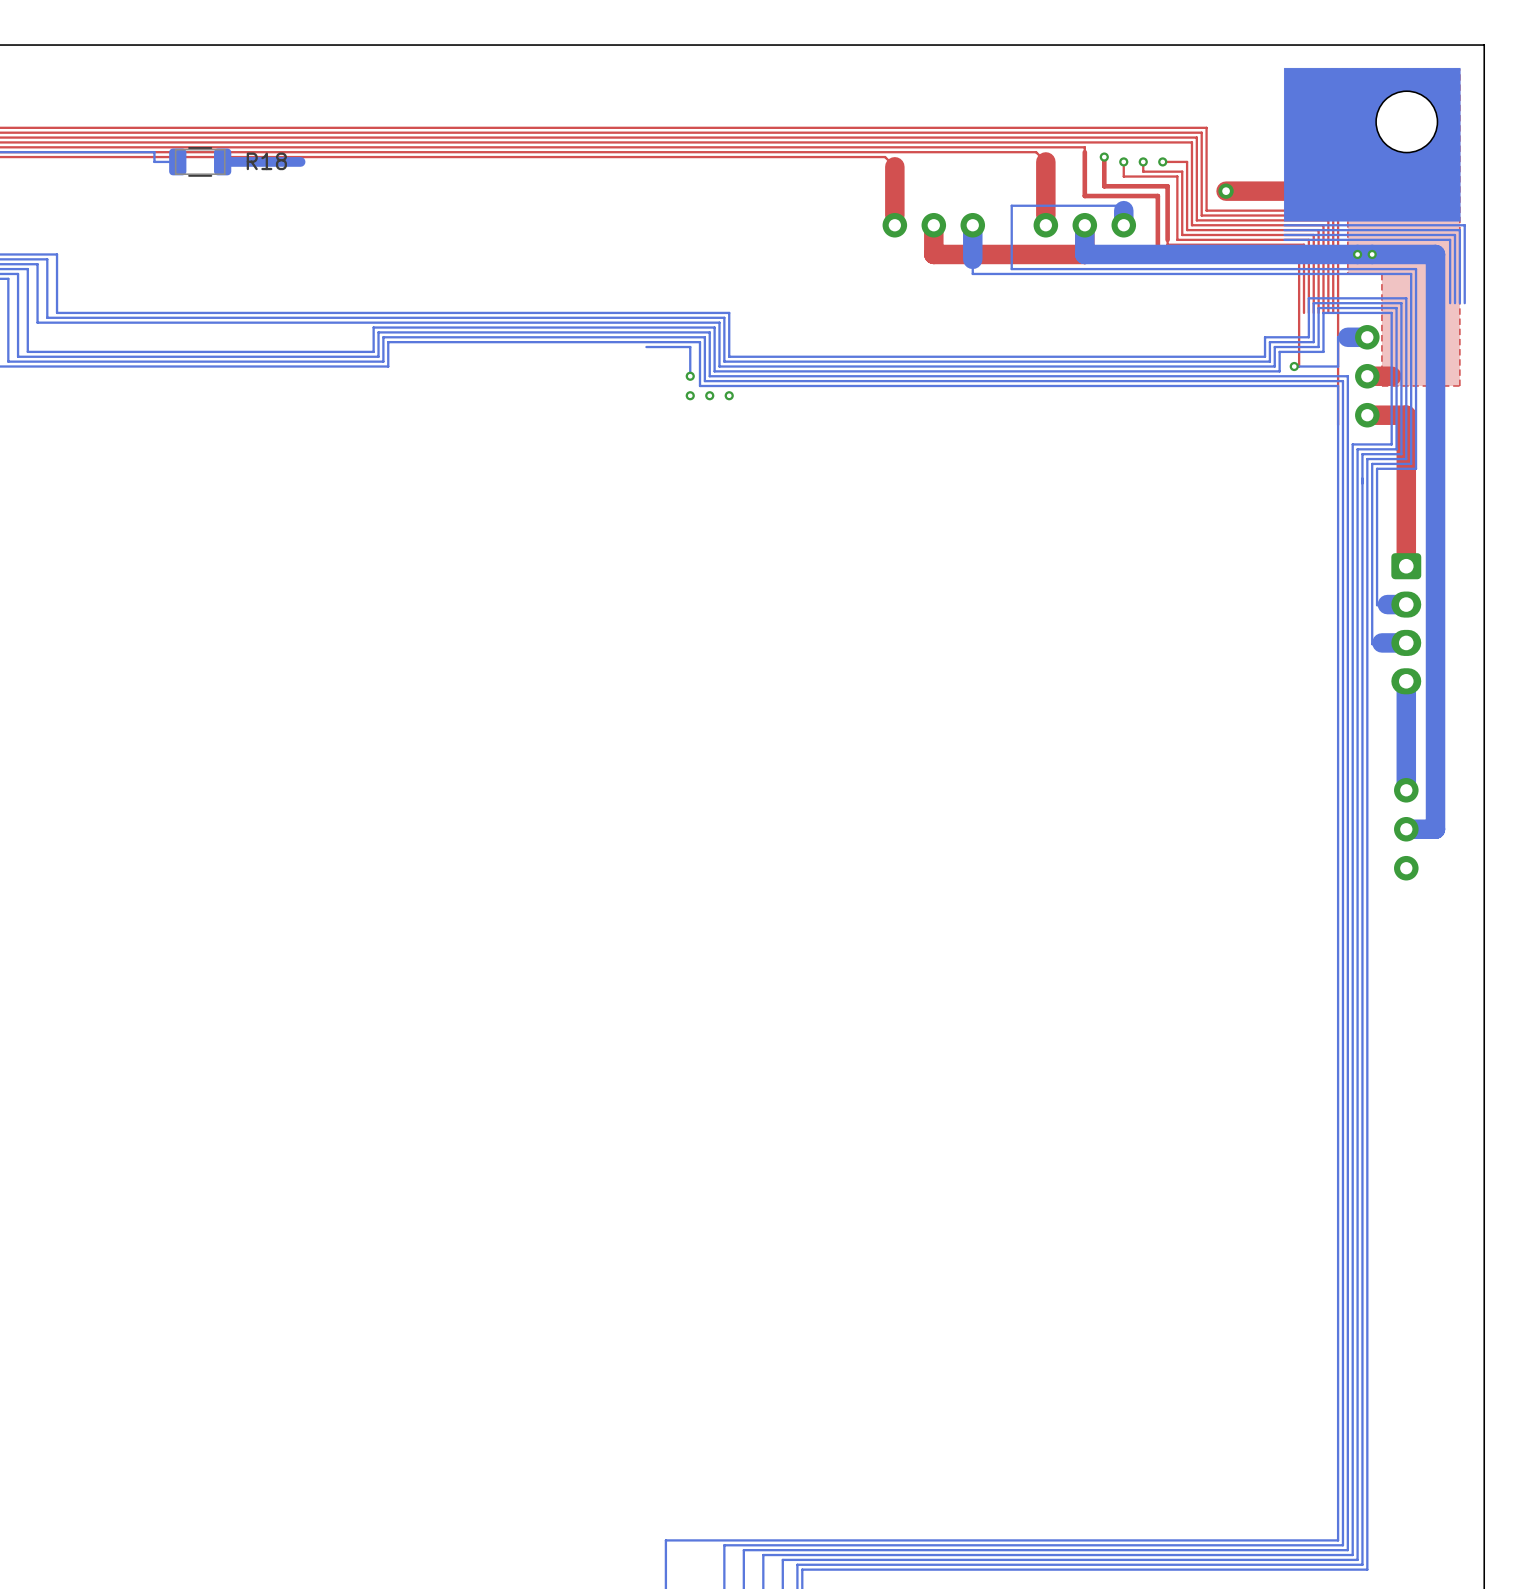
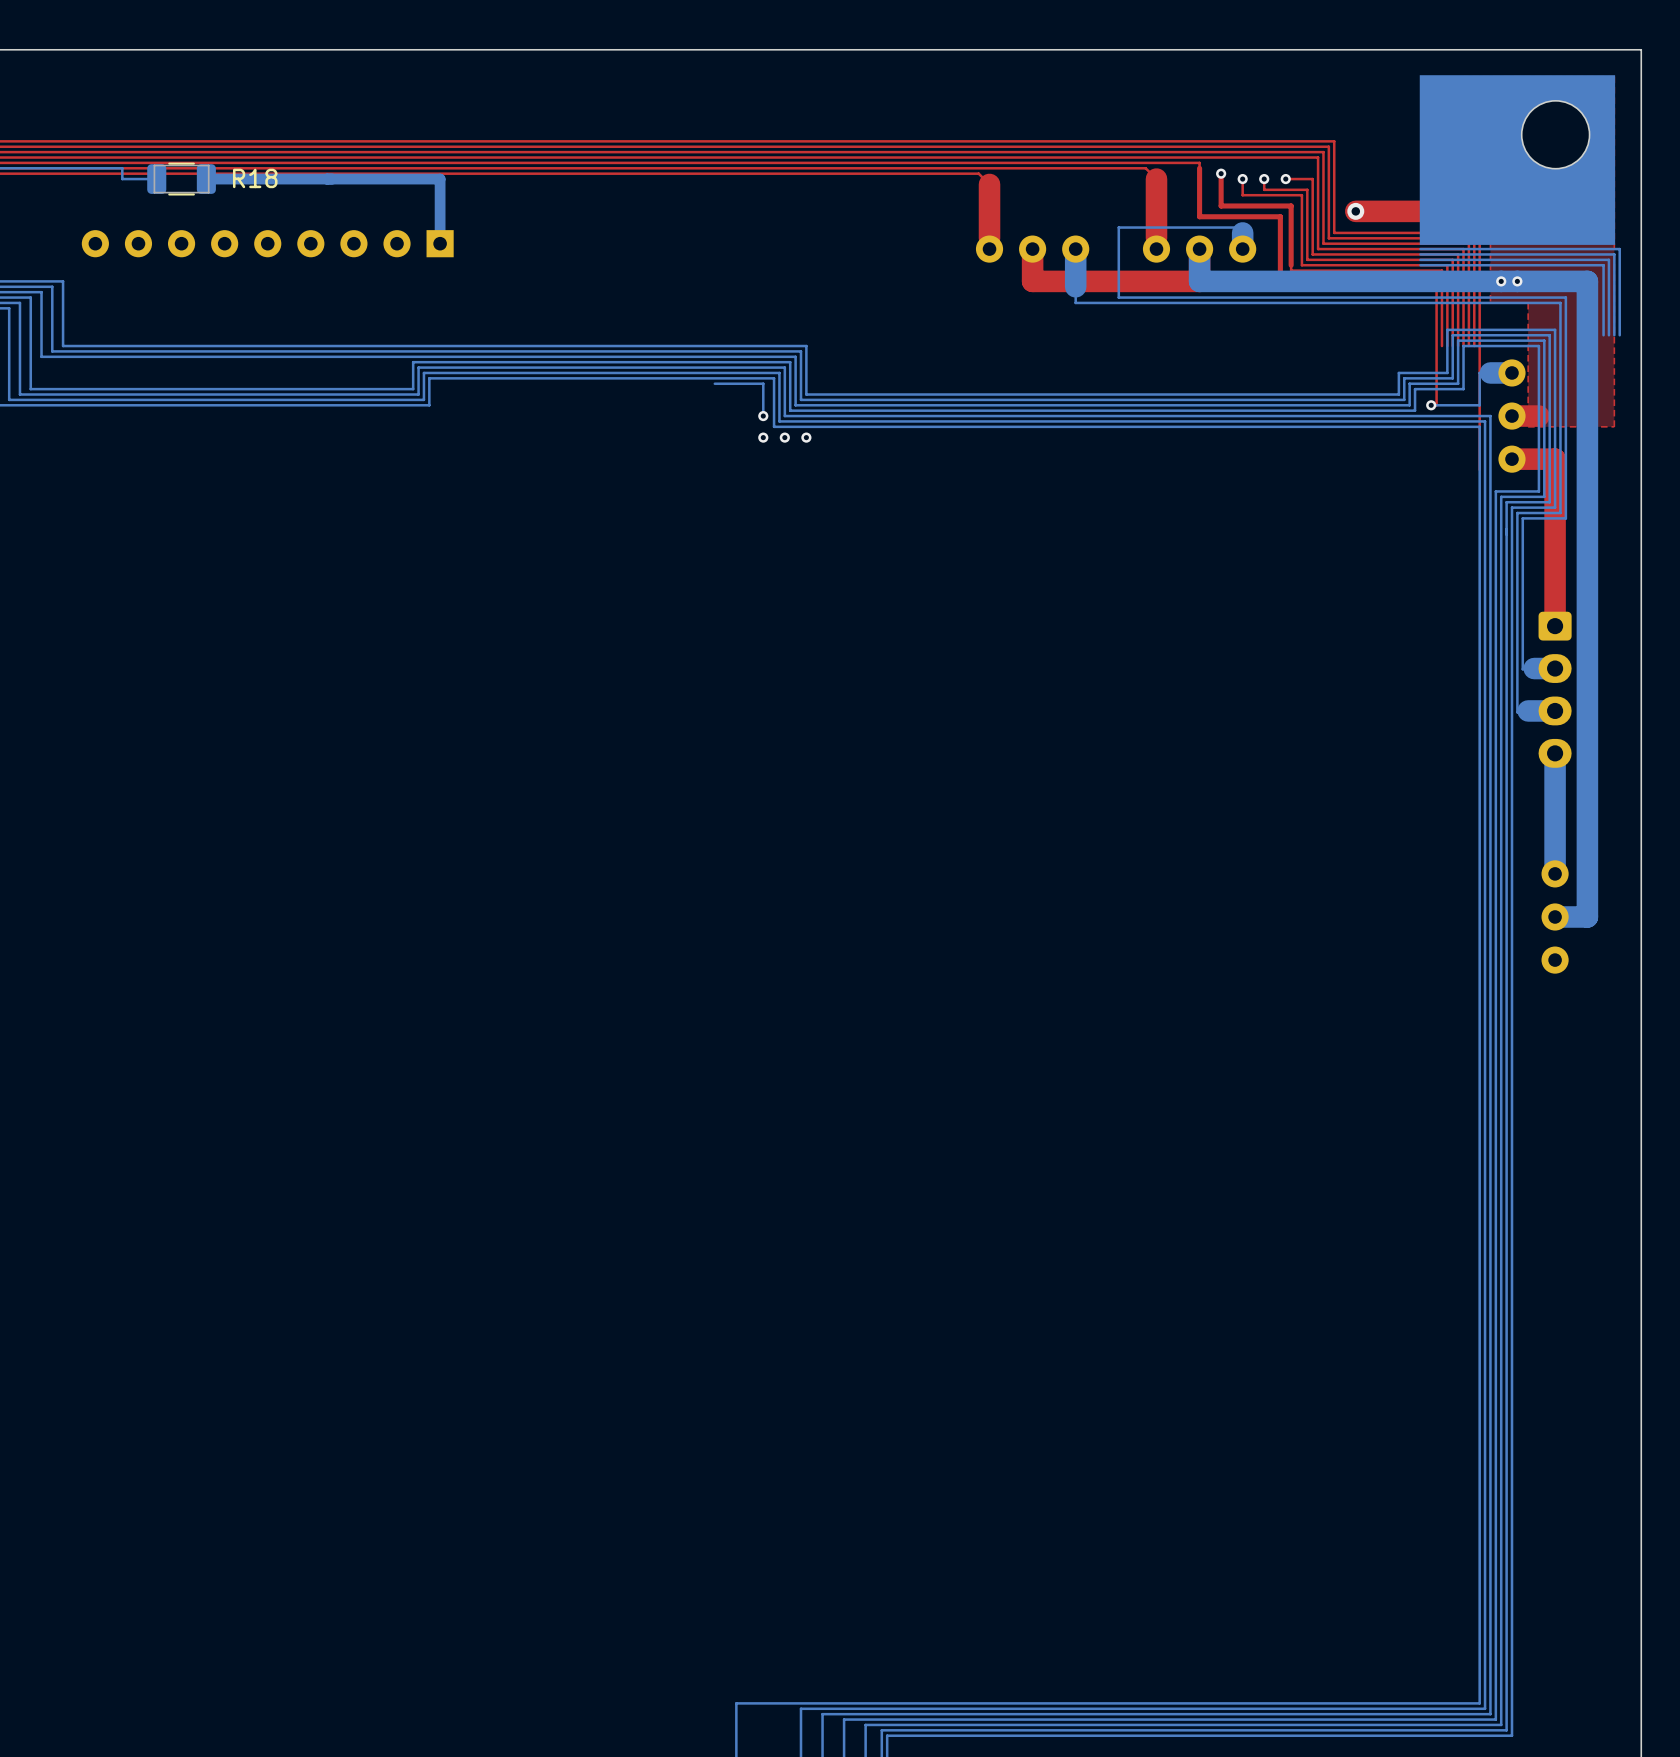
bottom track: (110, 152) (154, 152) (154, 161) (177, 161) -> (122, 168) (122, 179) (156, 179)
R18 position: (200, 161) -> (181, 179)
bottom track: none -> (246, 179) (206, 179)
bottom track: none -> (332, 179) (440, 179) (440, 243)
part: none -> (267, 243)

